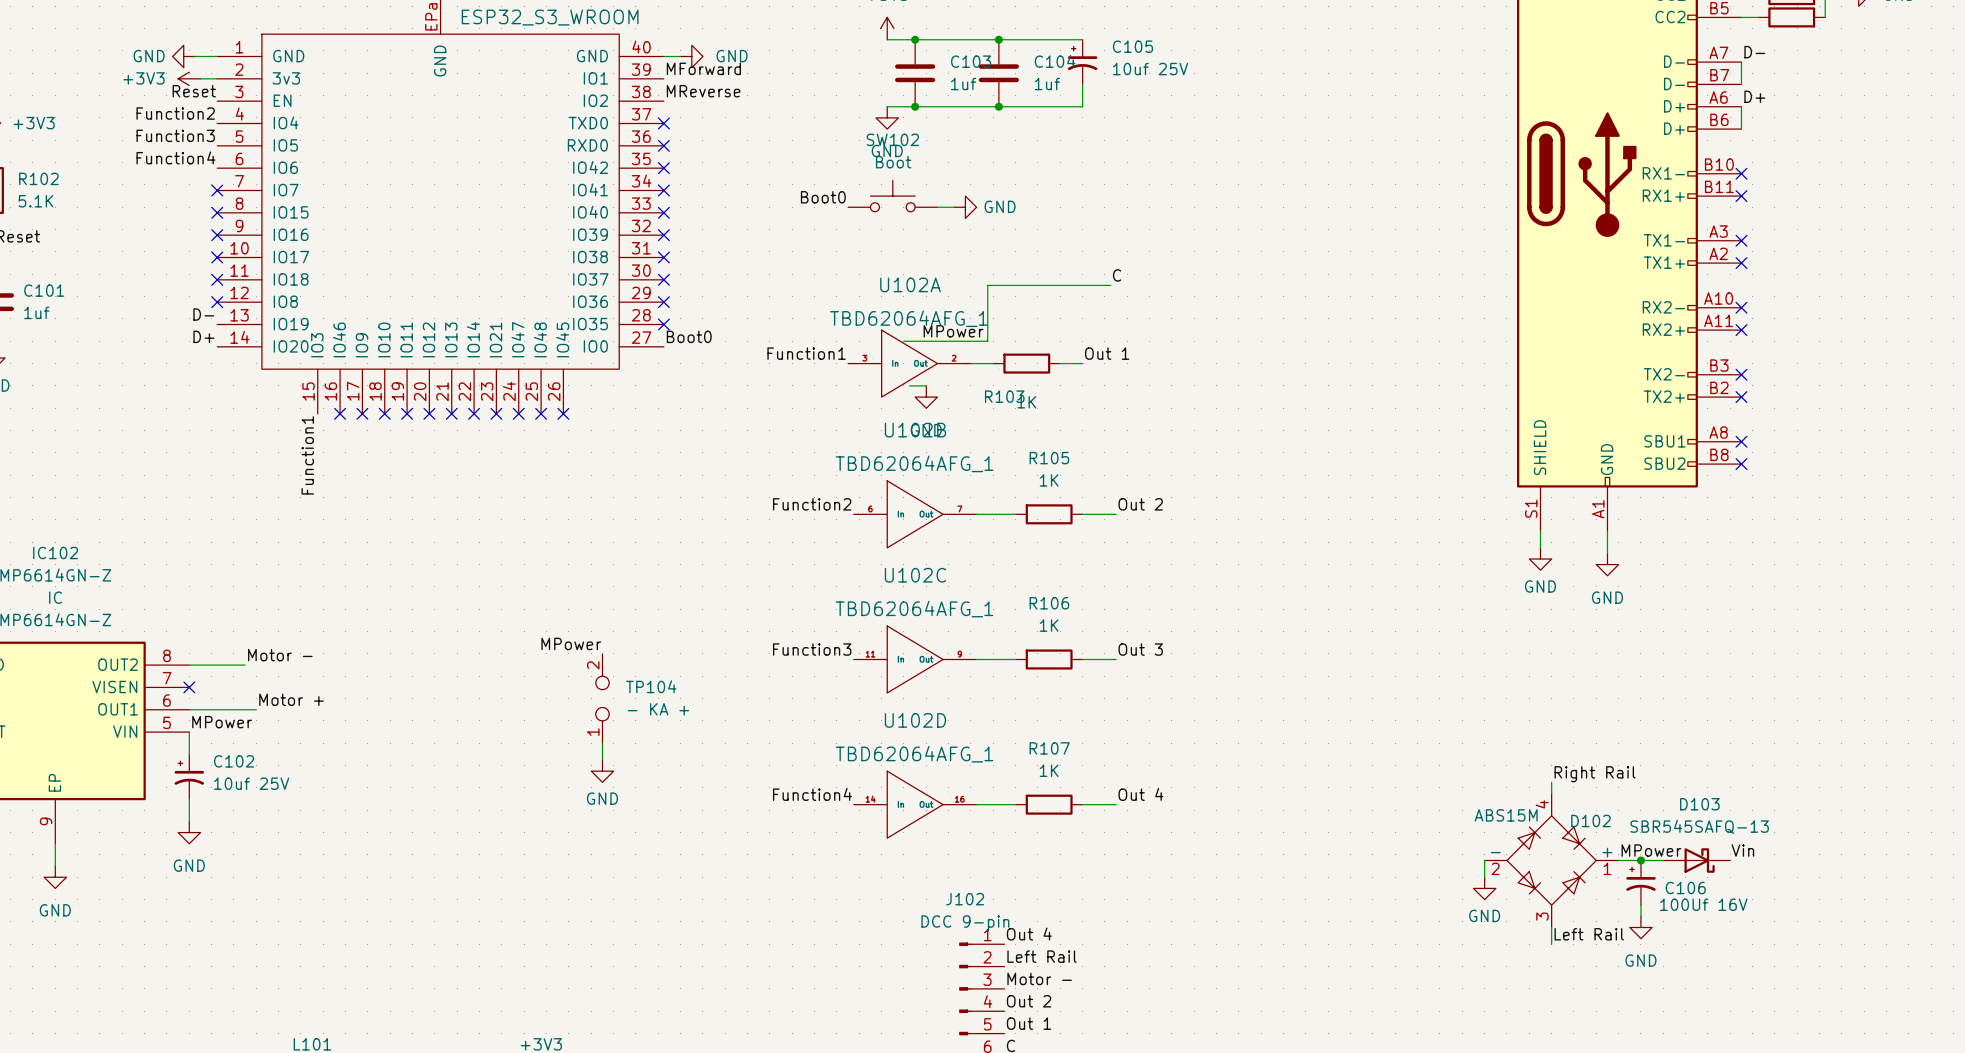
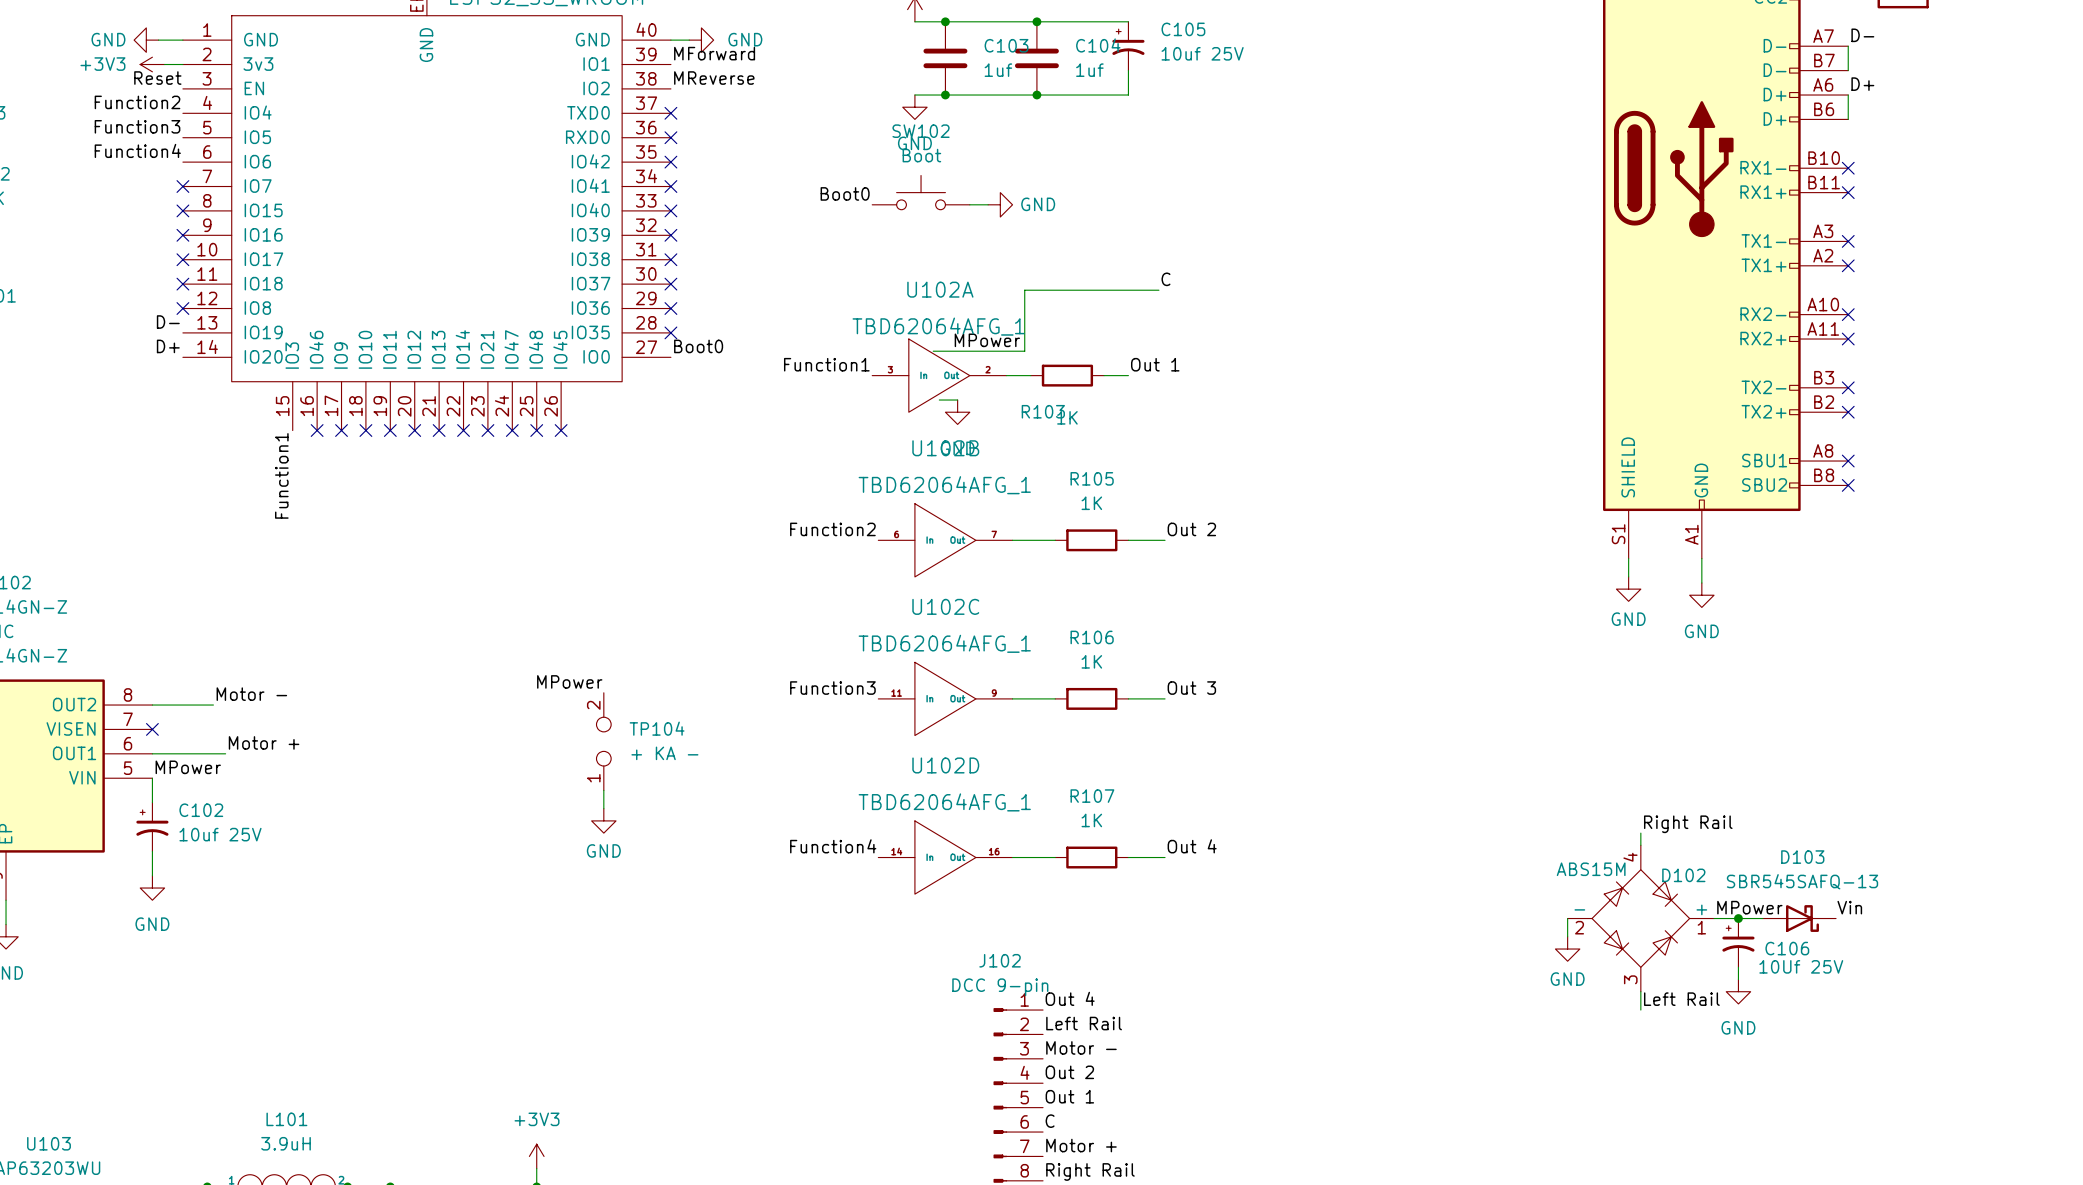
TP104 value: - KA + (658, 709) -> + KA - (664, 753)
C106 value: 100Uf 16V (1703, 904) -> 10Uf 25V (1801, 966)

